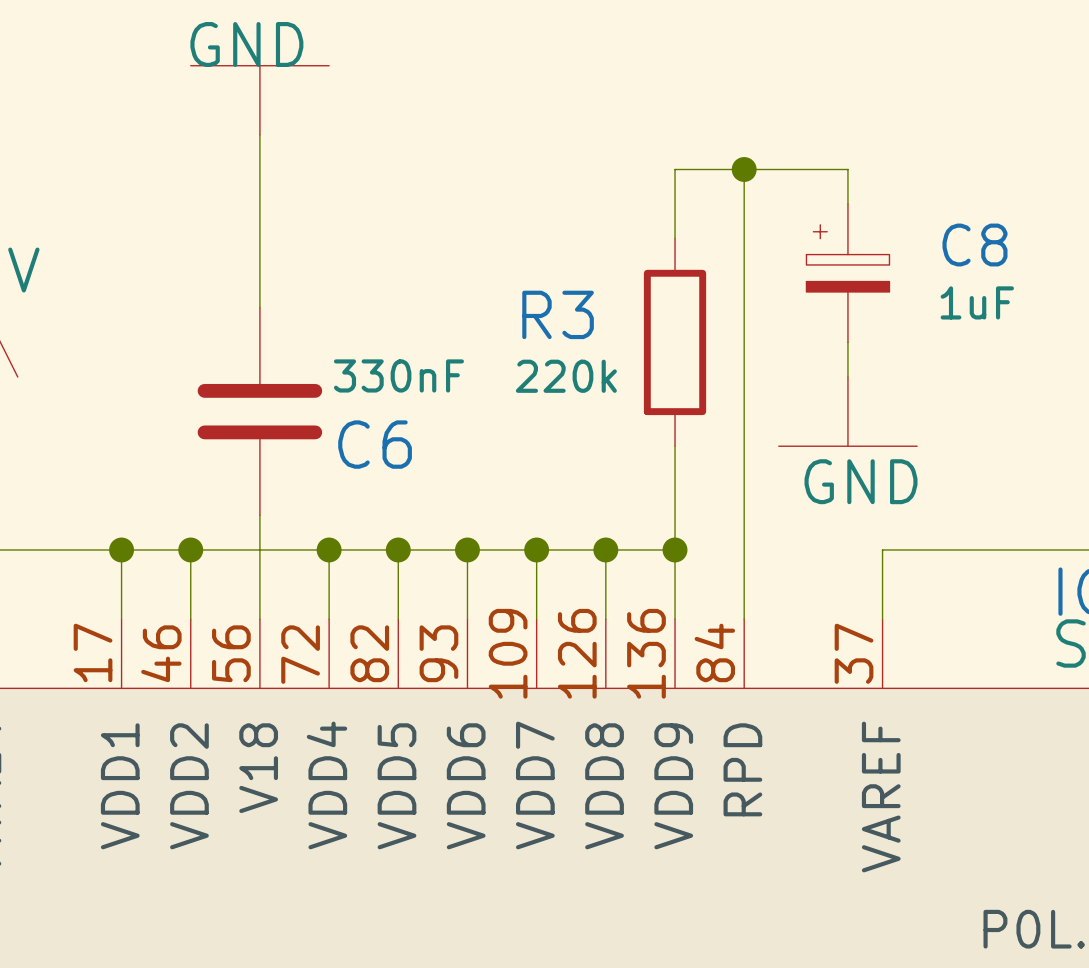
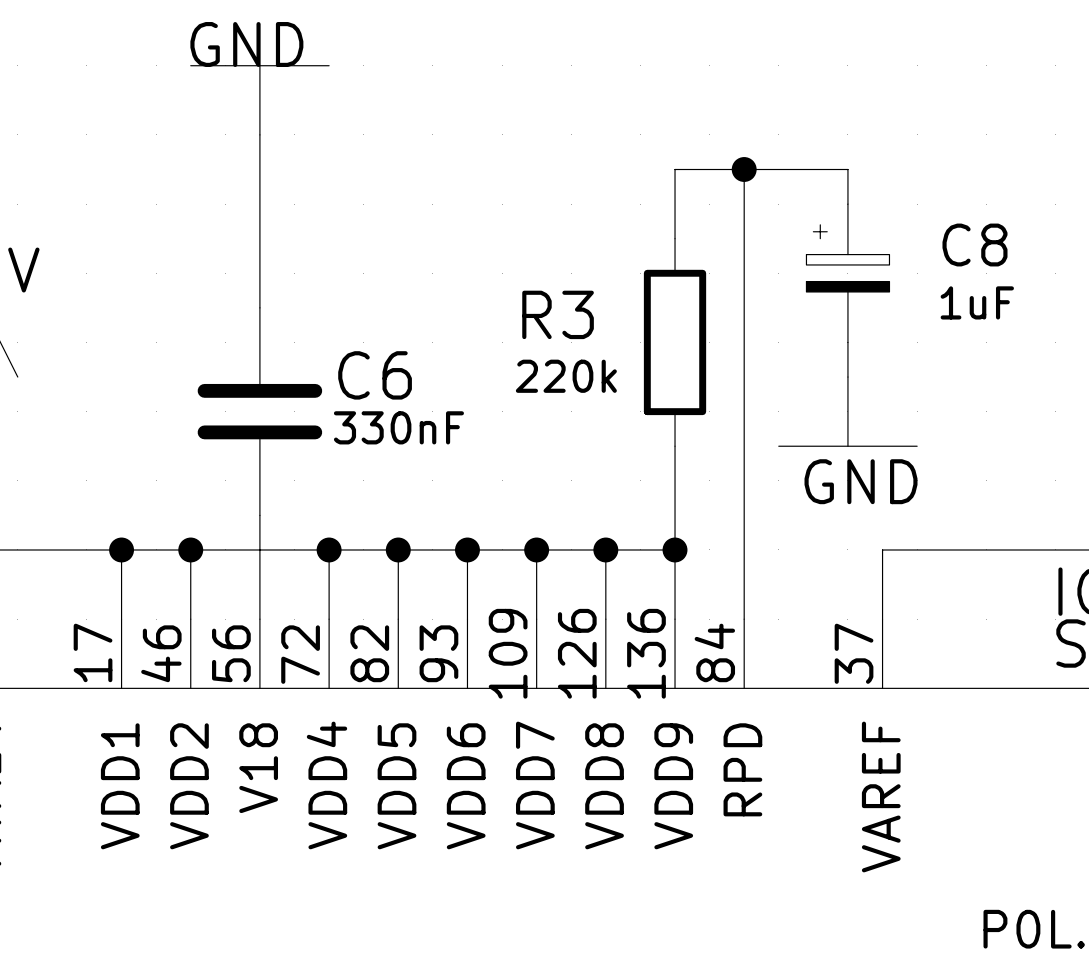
C6 value position: 330nF (398, 375) -> 330nF (398, 427)
C6 name position: C6 (375, 444) -> C6 (375, 375)

